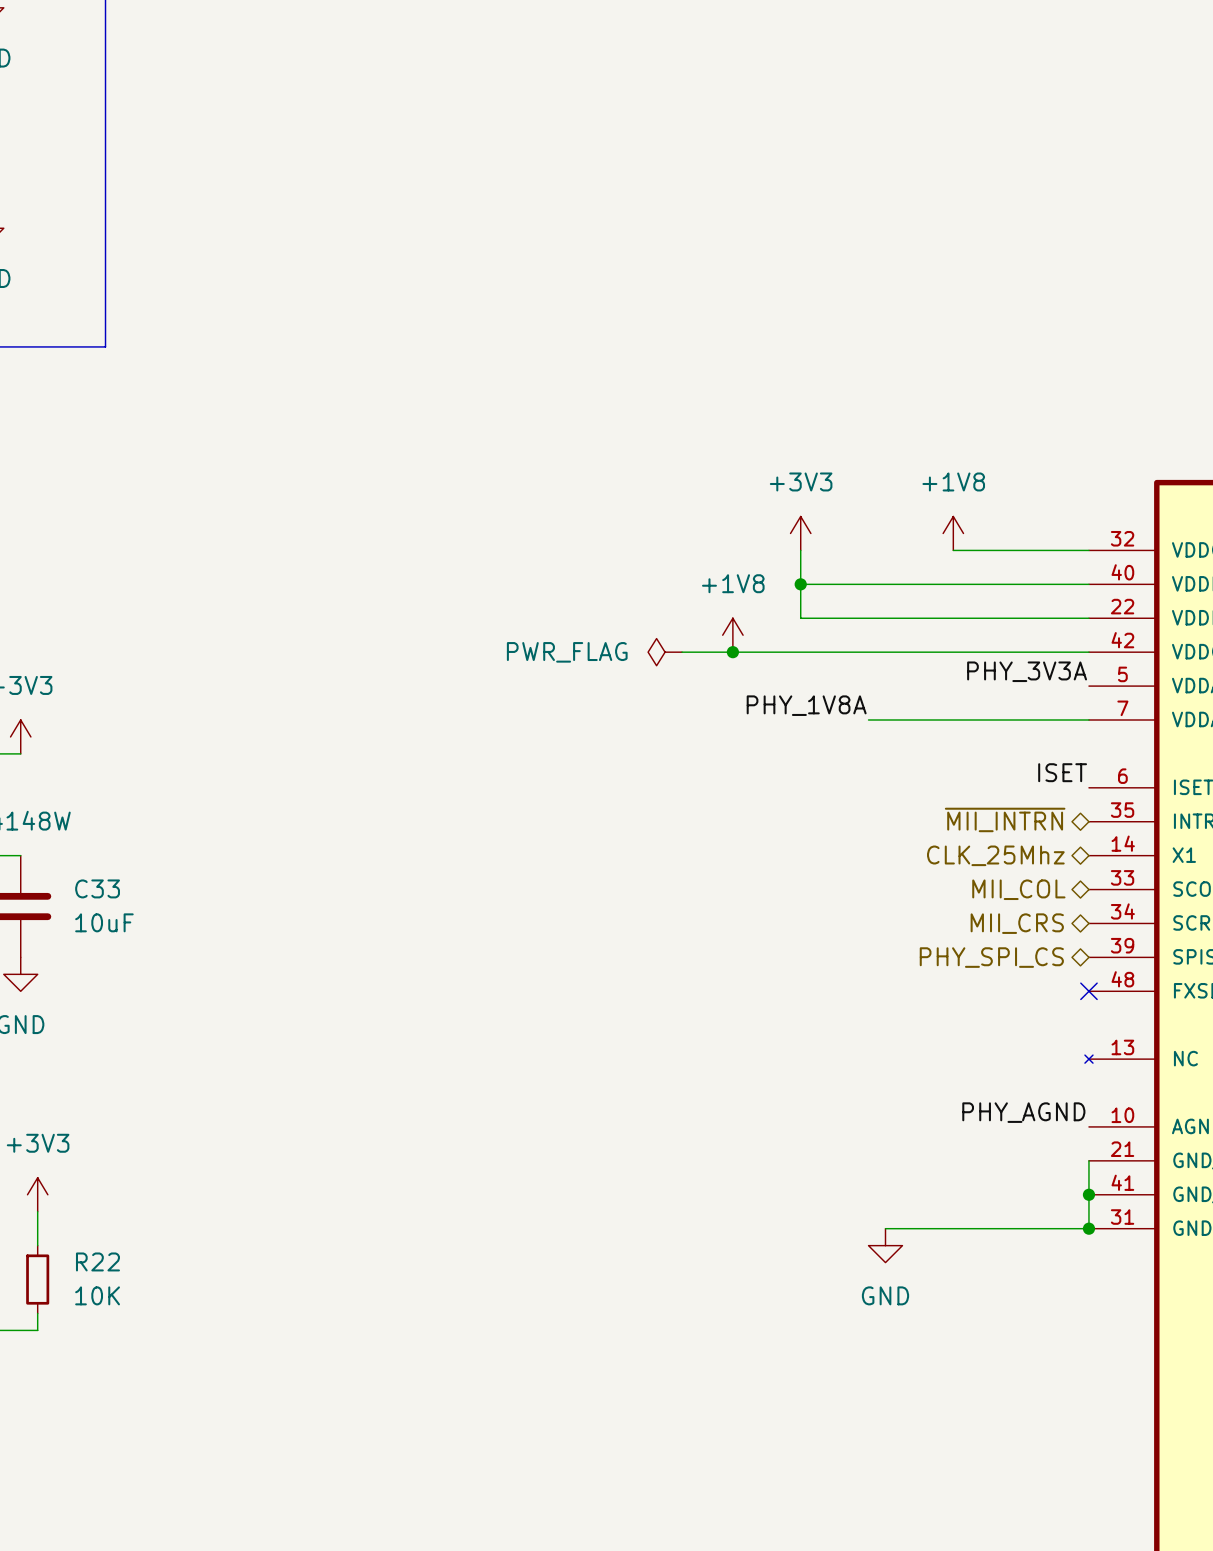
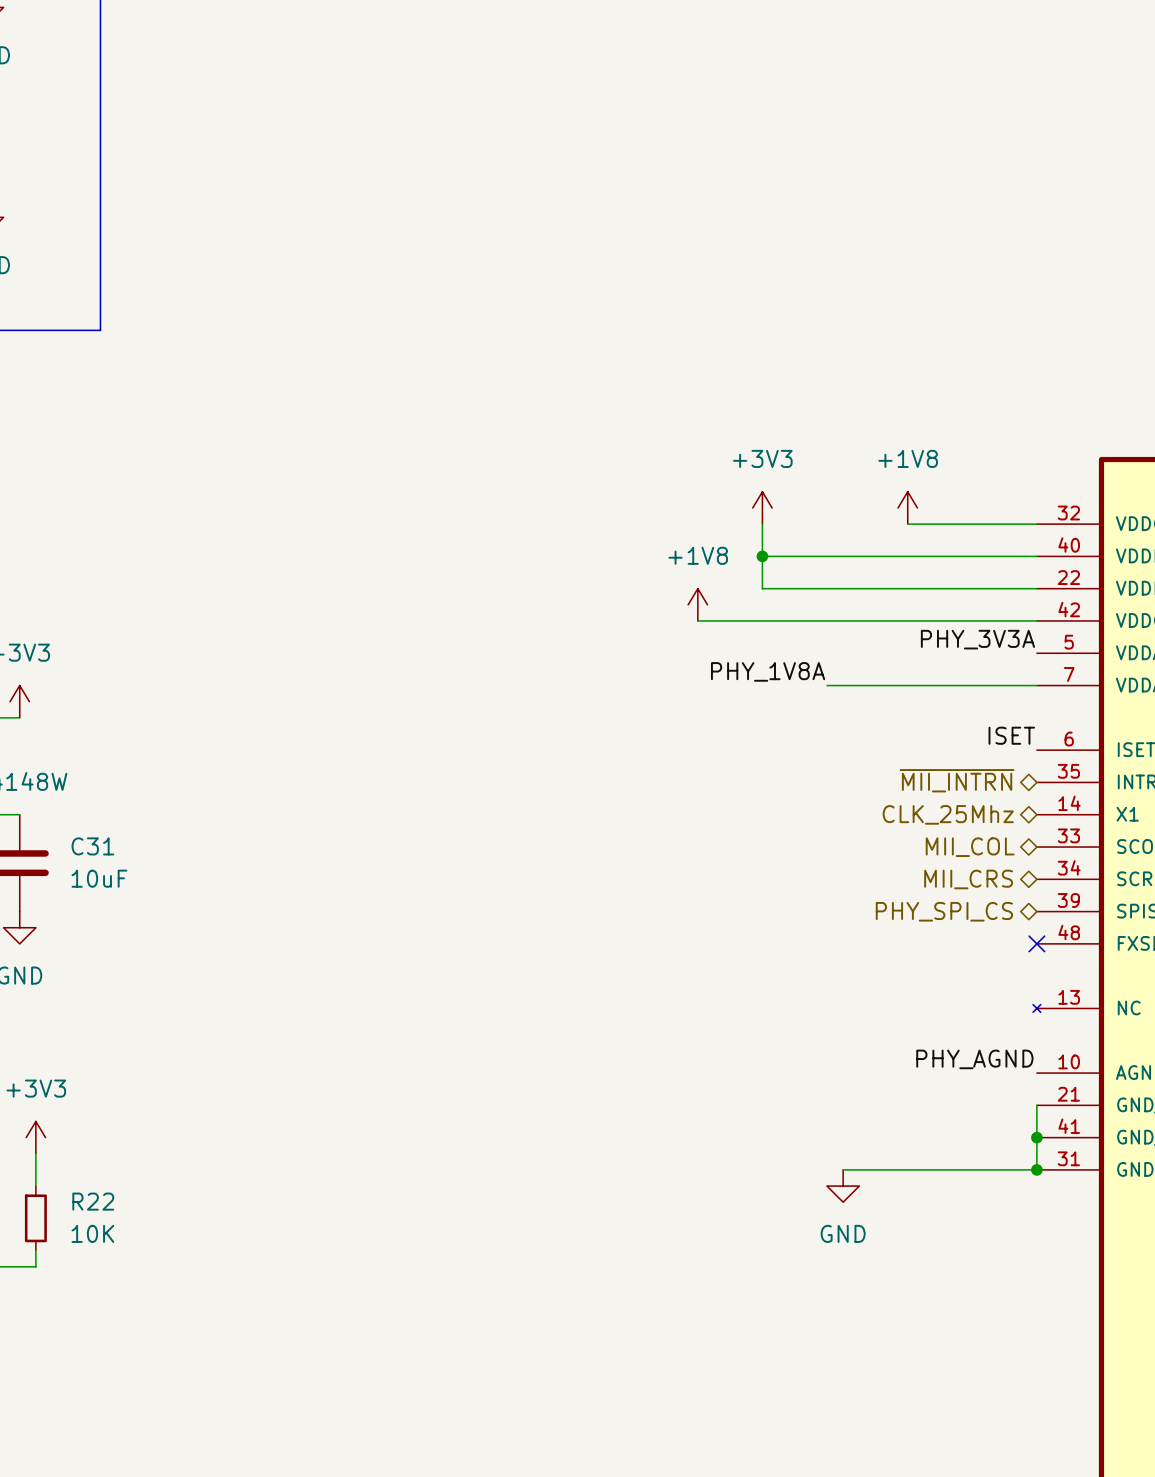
power symbol: PWR_FLAG (665, 652) -> none
wire: (682, 652) (732, 652) -> none
junction: (732, 652) -> none
C33 name: C33 (97, 888) -> C31 (92, 846)

